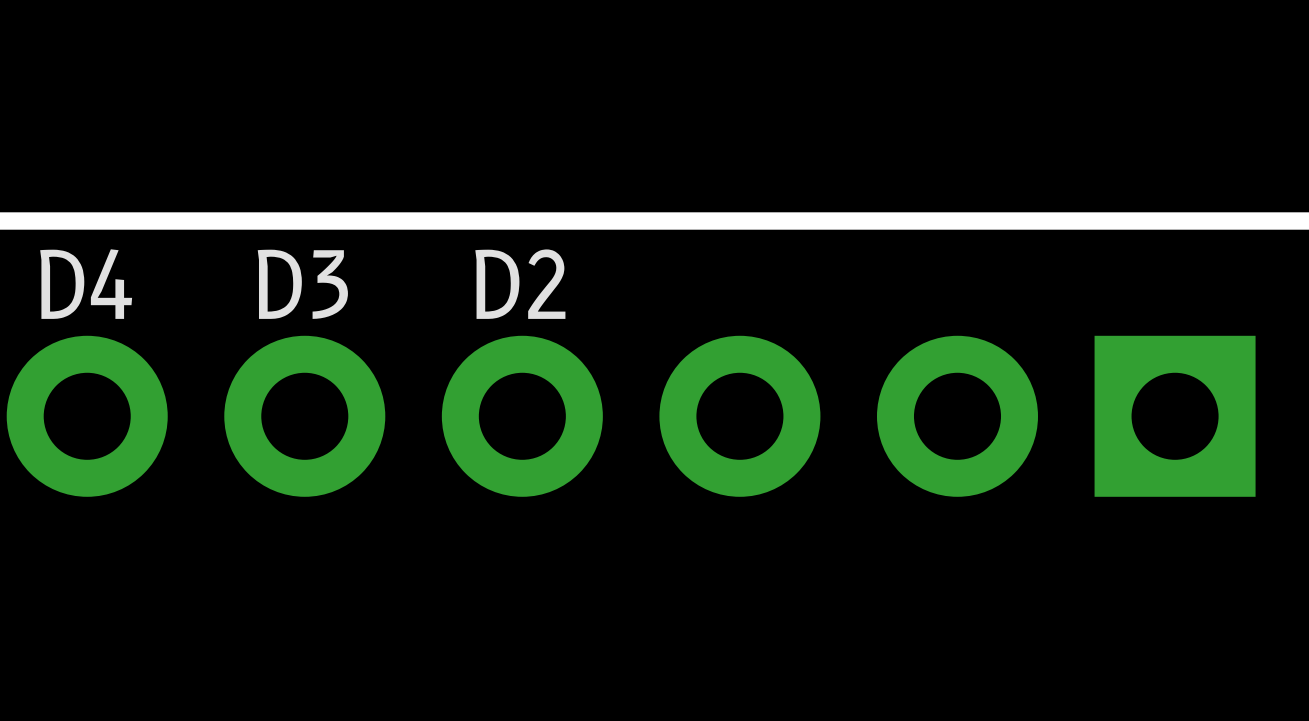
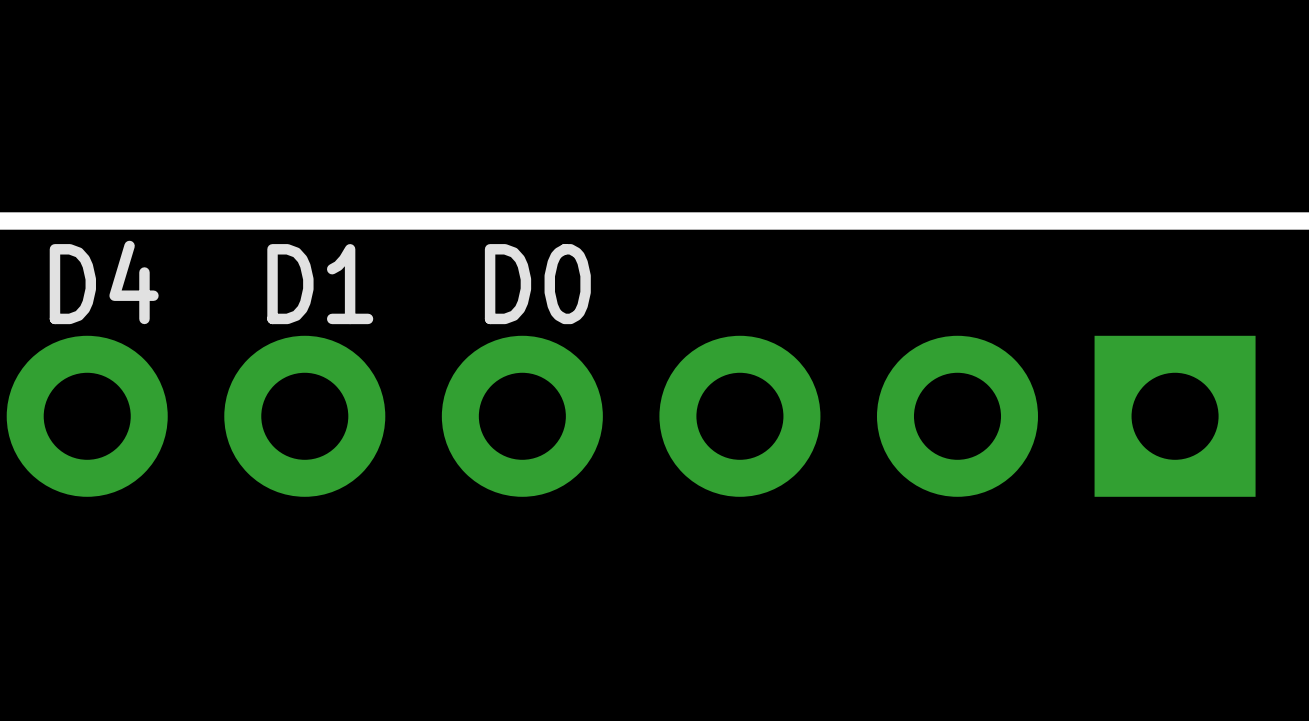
text: D3 (302, 284) -> D1 (320, 284)
text: D2 (520, 284) -> D0 (537, 284)

